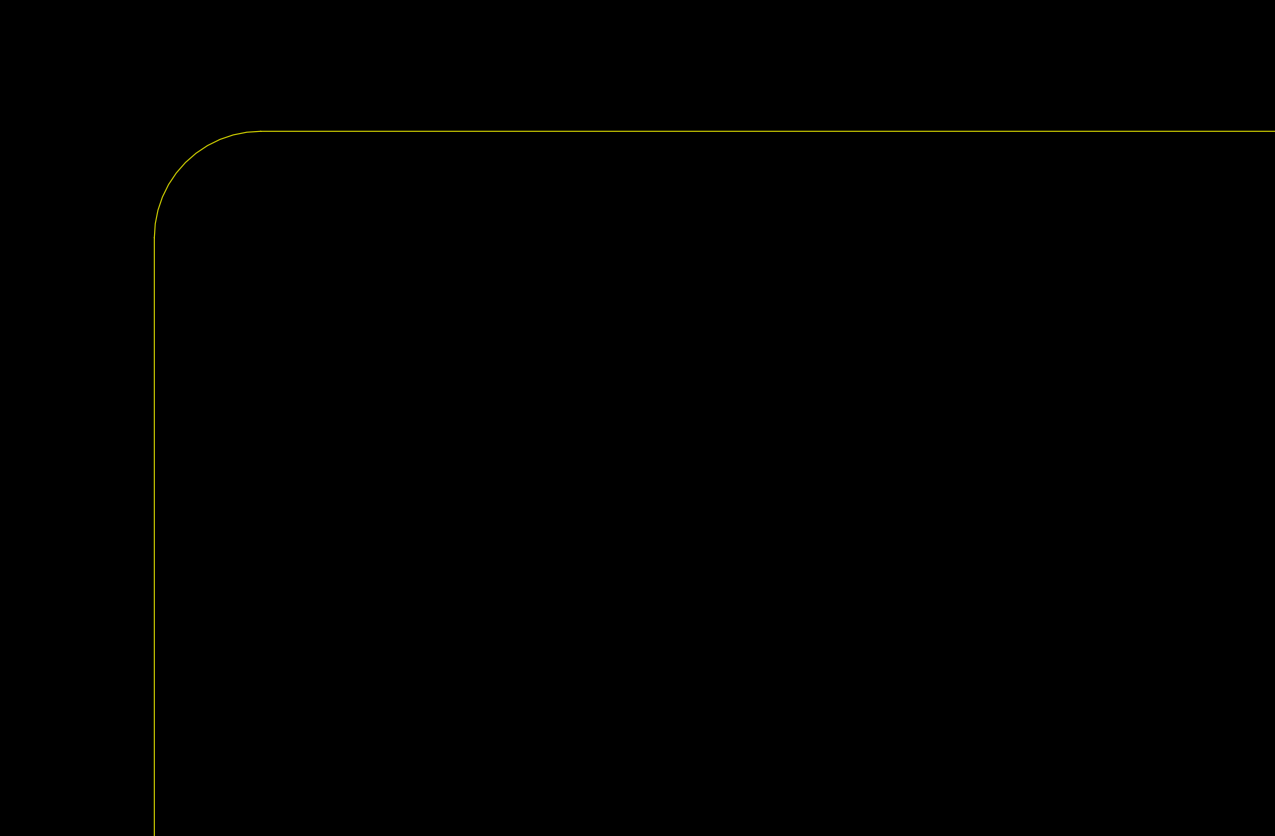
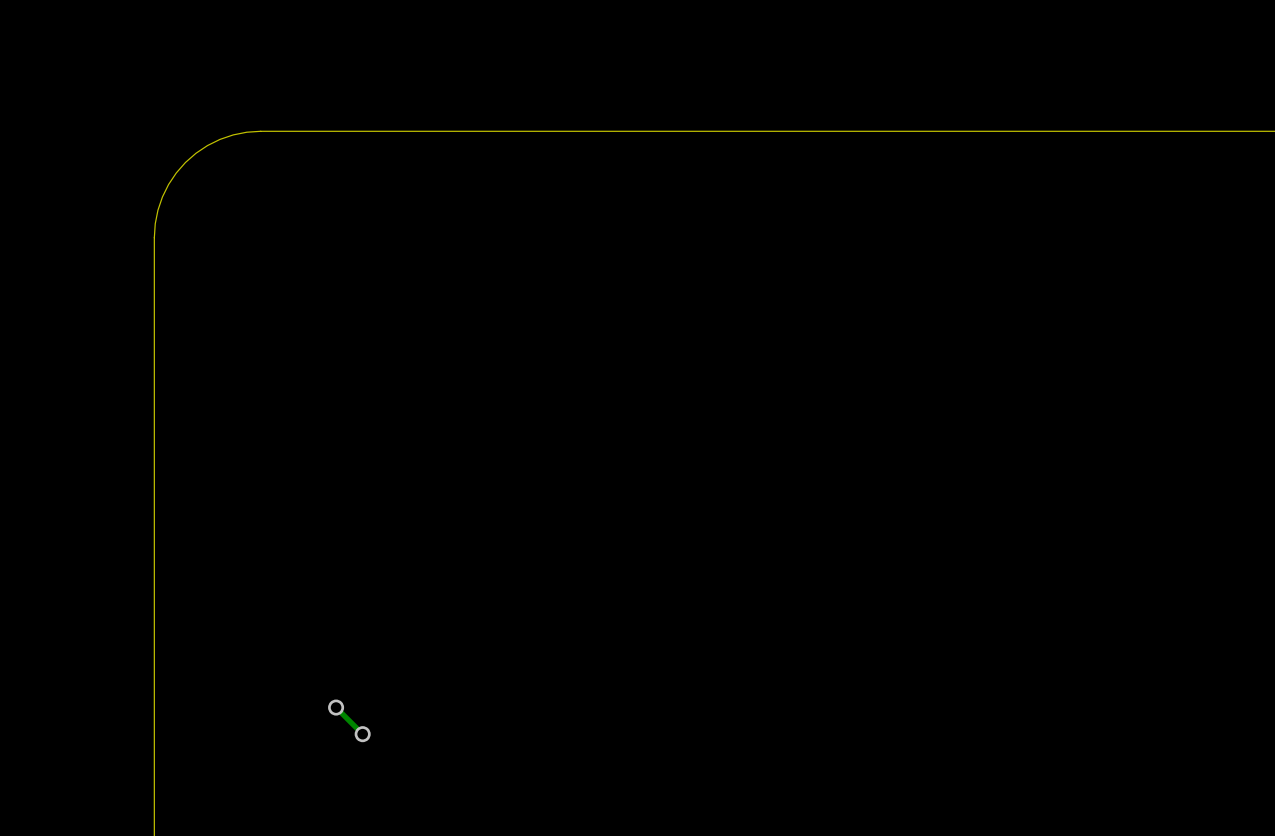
track: none -> (336, 707) (362, 734)
via: none -> (336, 707)
via: none -> (362, 734)

